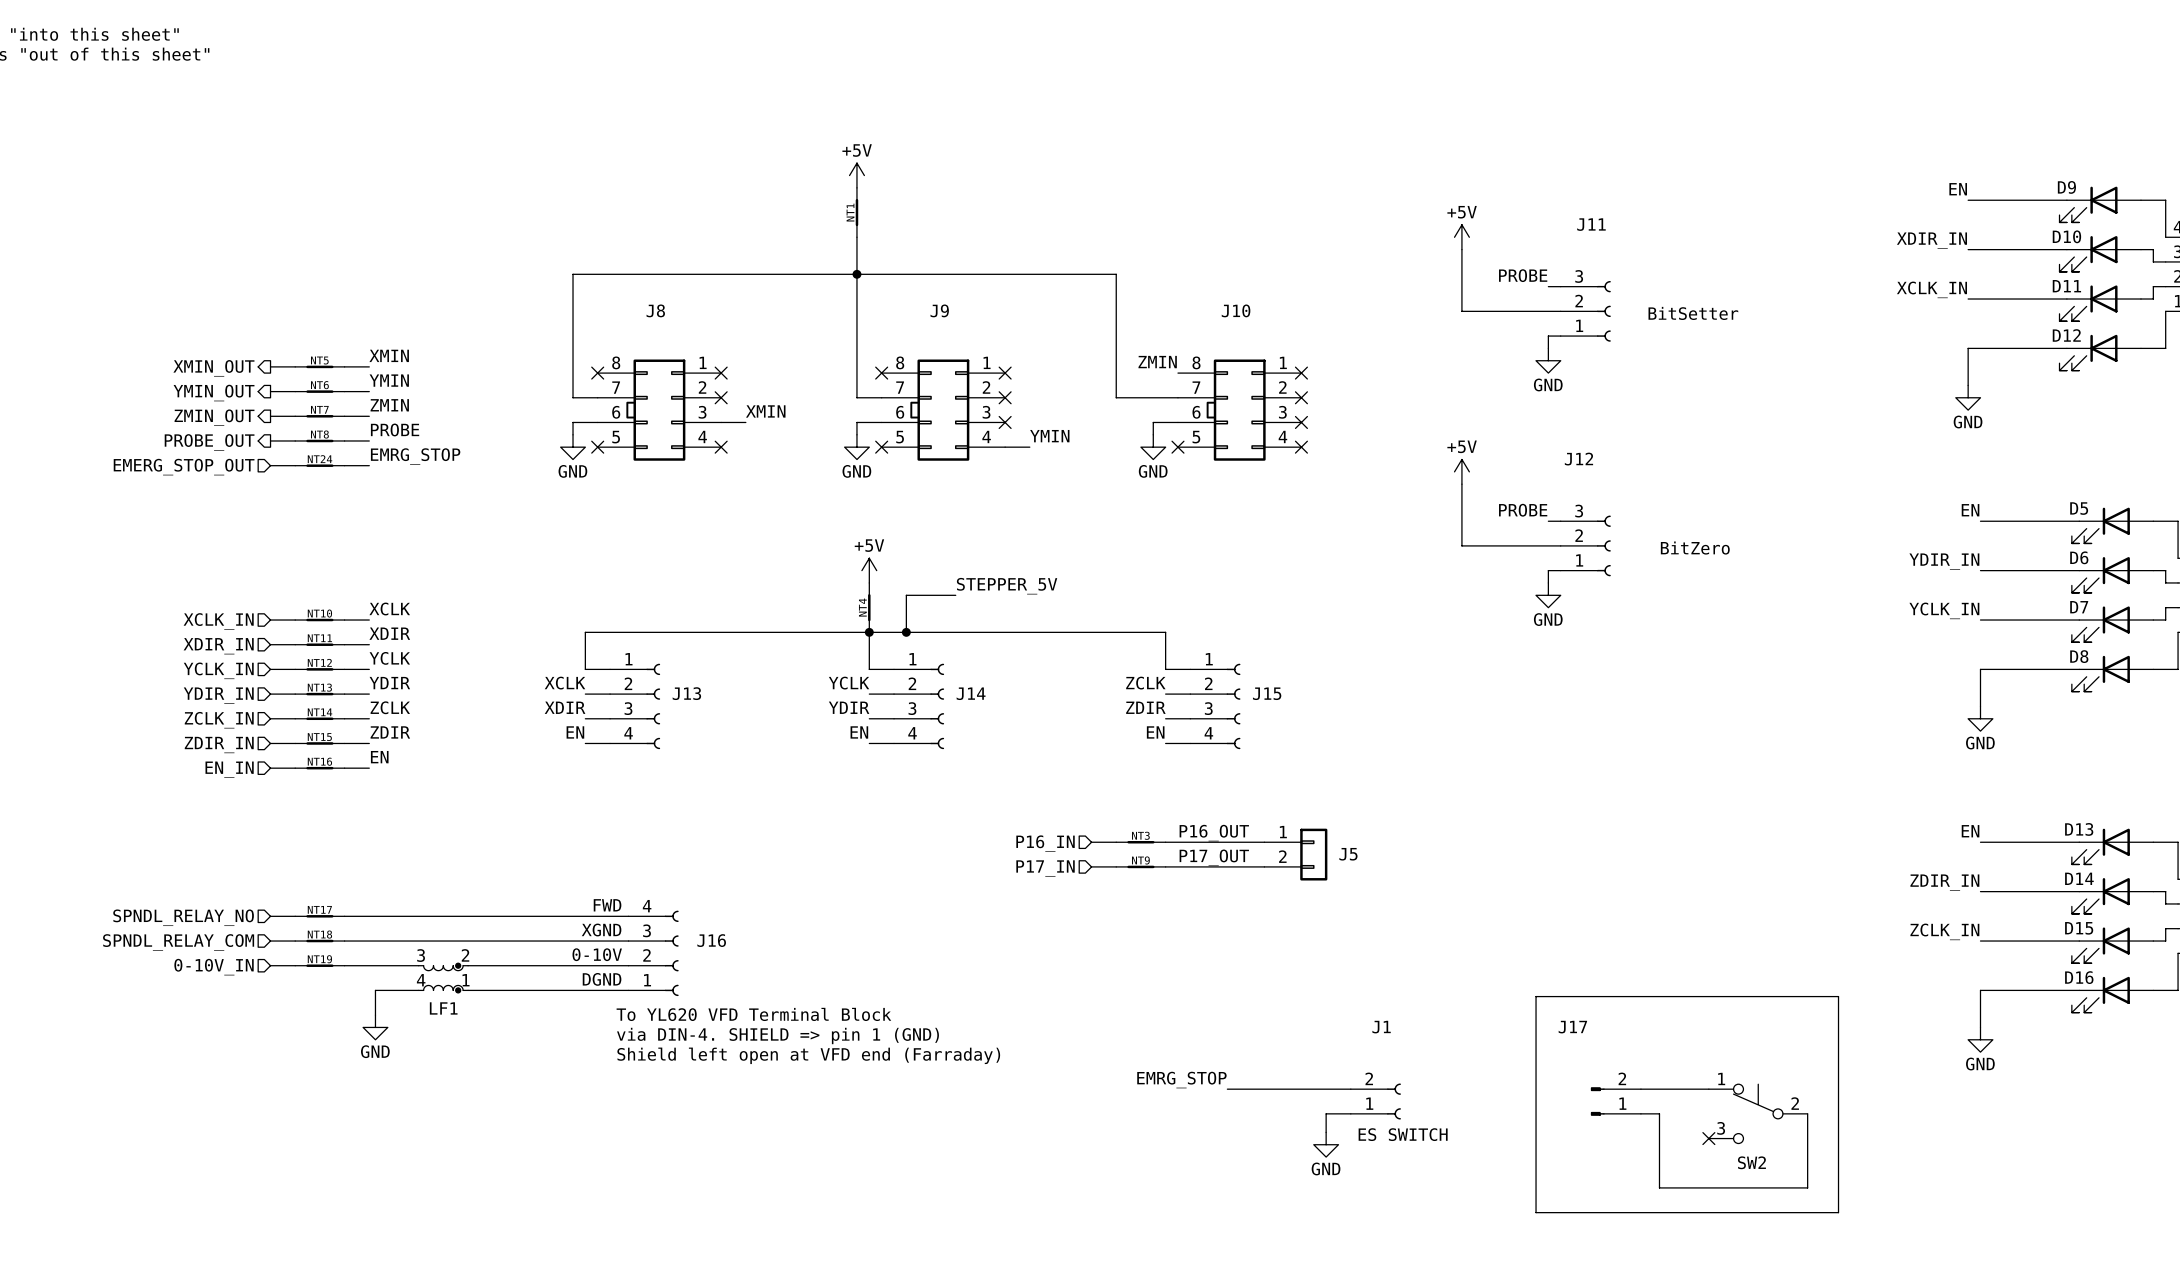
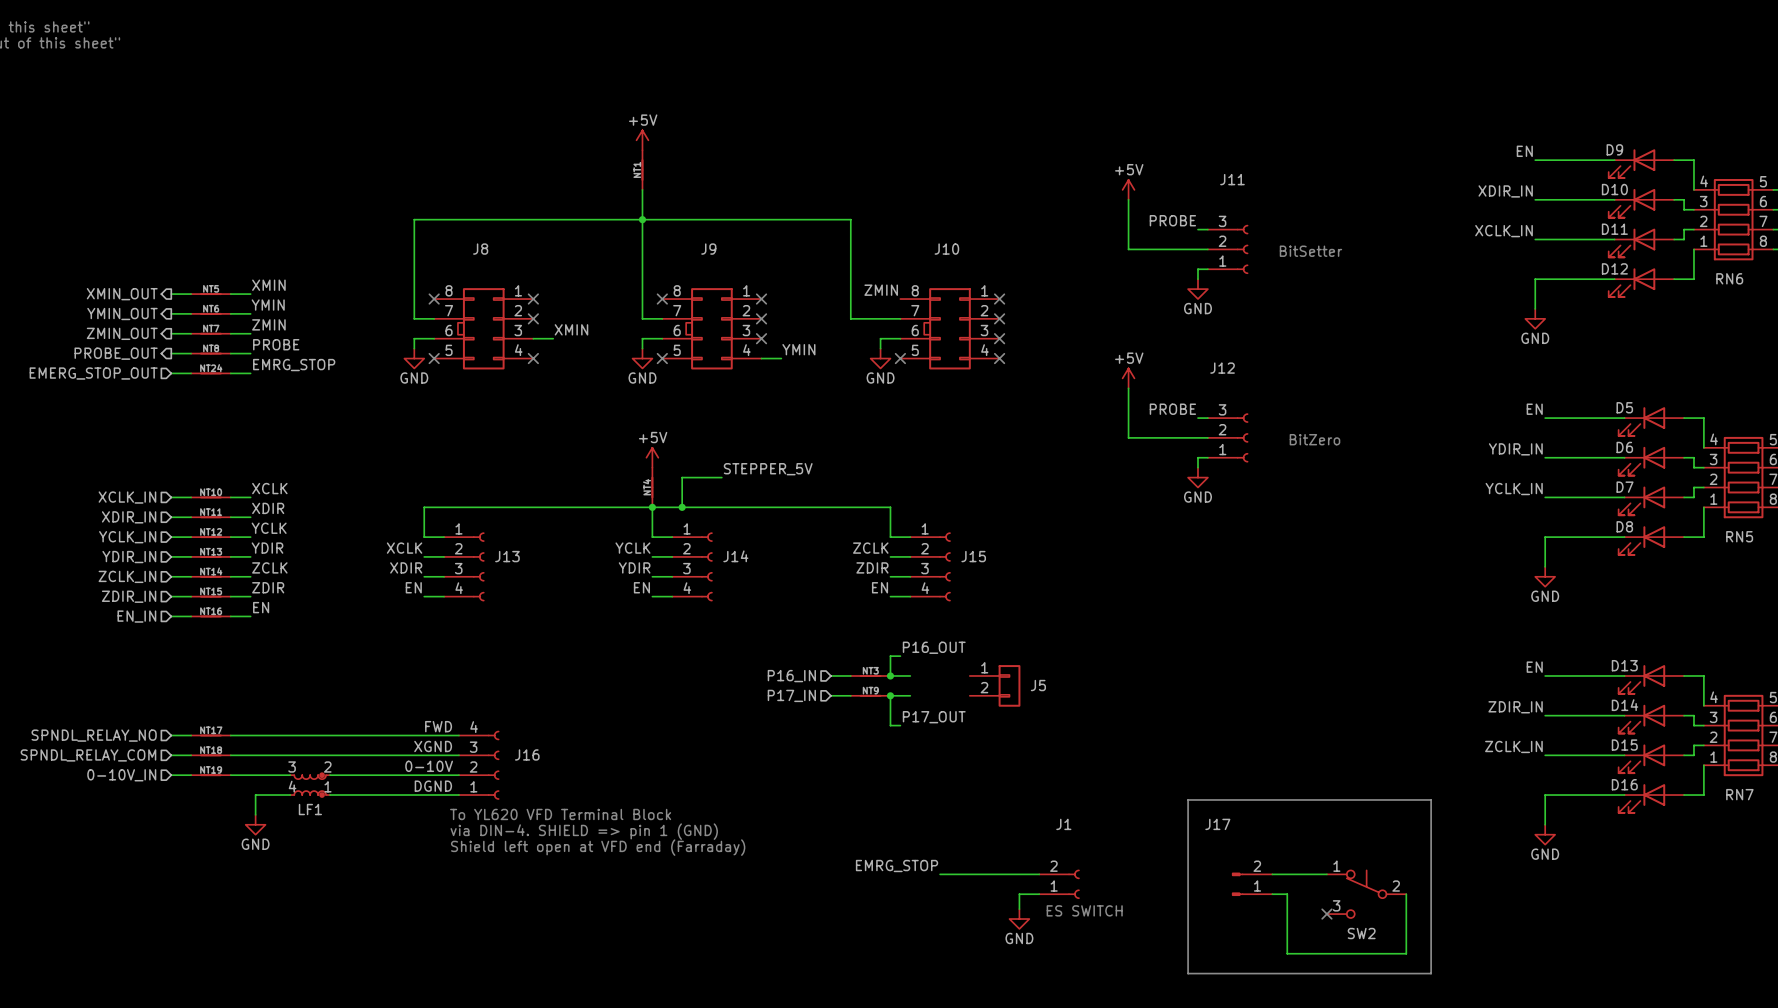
wire: none -> (900, 656) (890, 656) (890, 675)
label position: P16_OUT (1214, 833) -> P16_OUT (934, 647)
junction: none -> (890, 675)
wire: (1190, 842) (1264, 842) -> none
label position: P17_OUT (1214, 857) -> P17_OUT (934, 717)
wire: none -> (890, 695) (890, 725) (900, 725)
junction: none -> (890, 695)
wire: (1190, 866) (1264, 866) -> none

